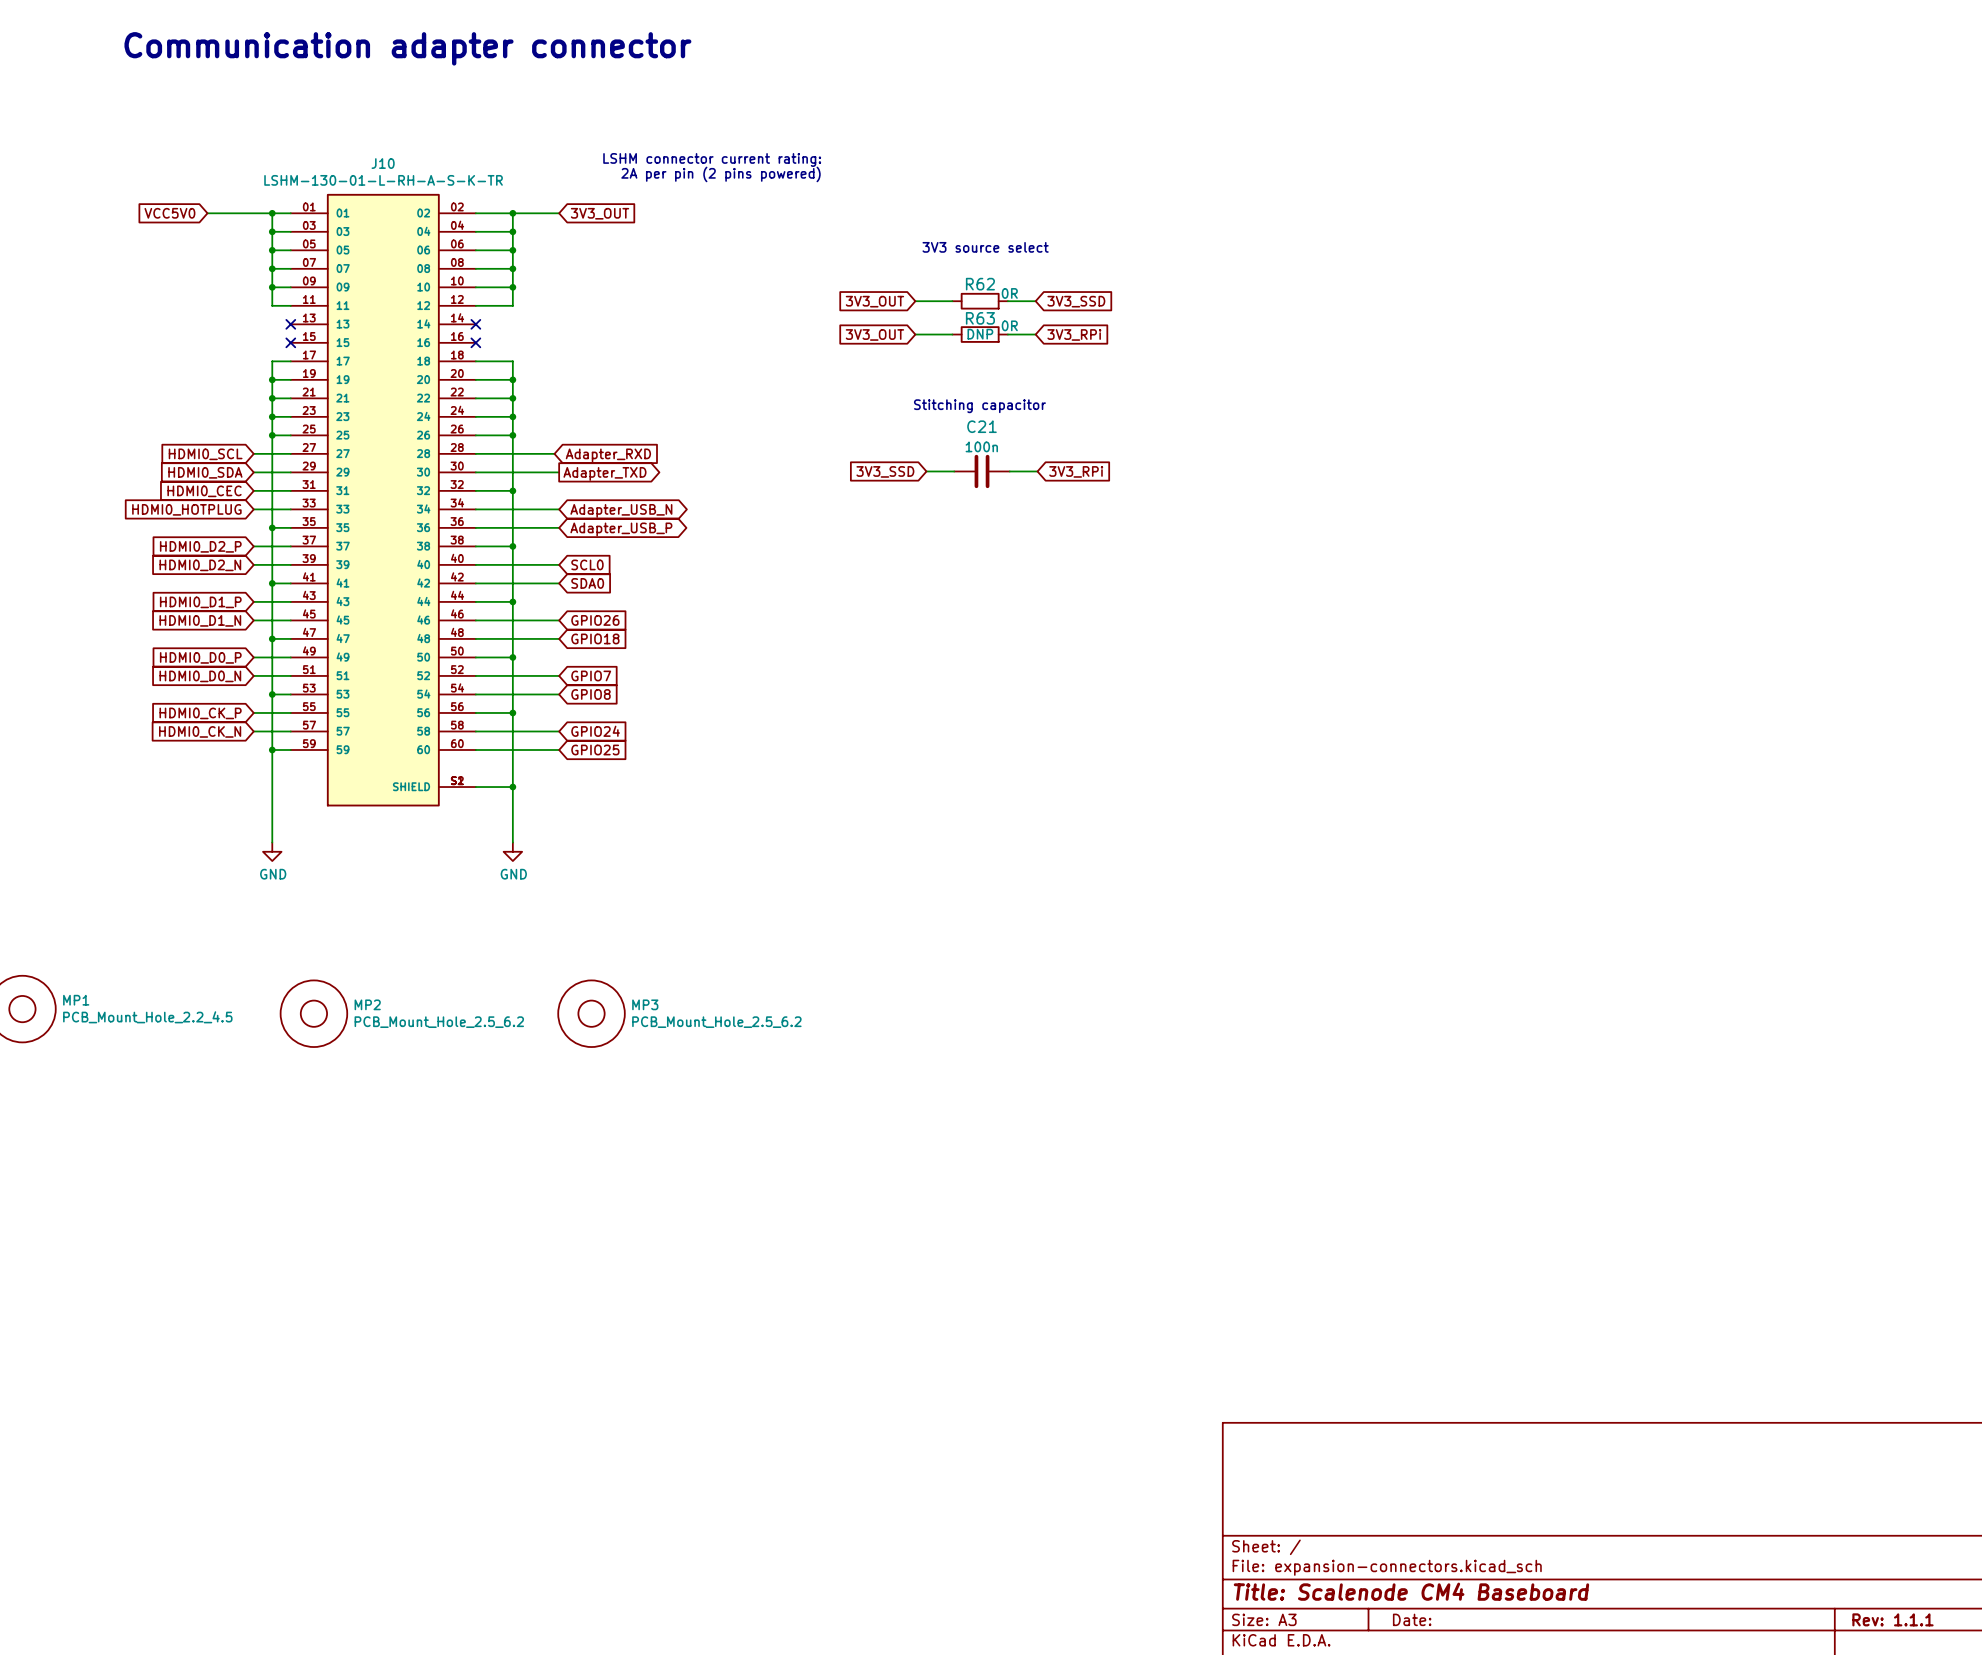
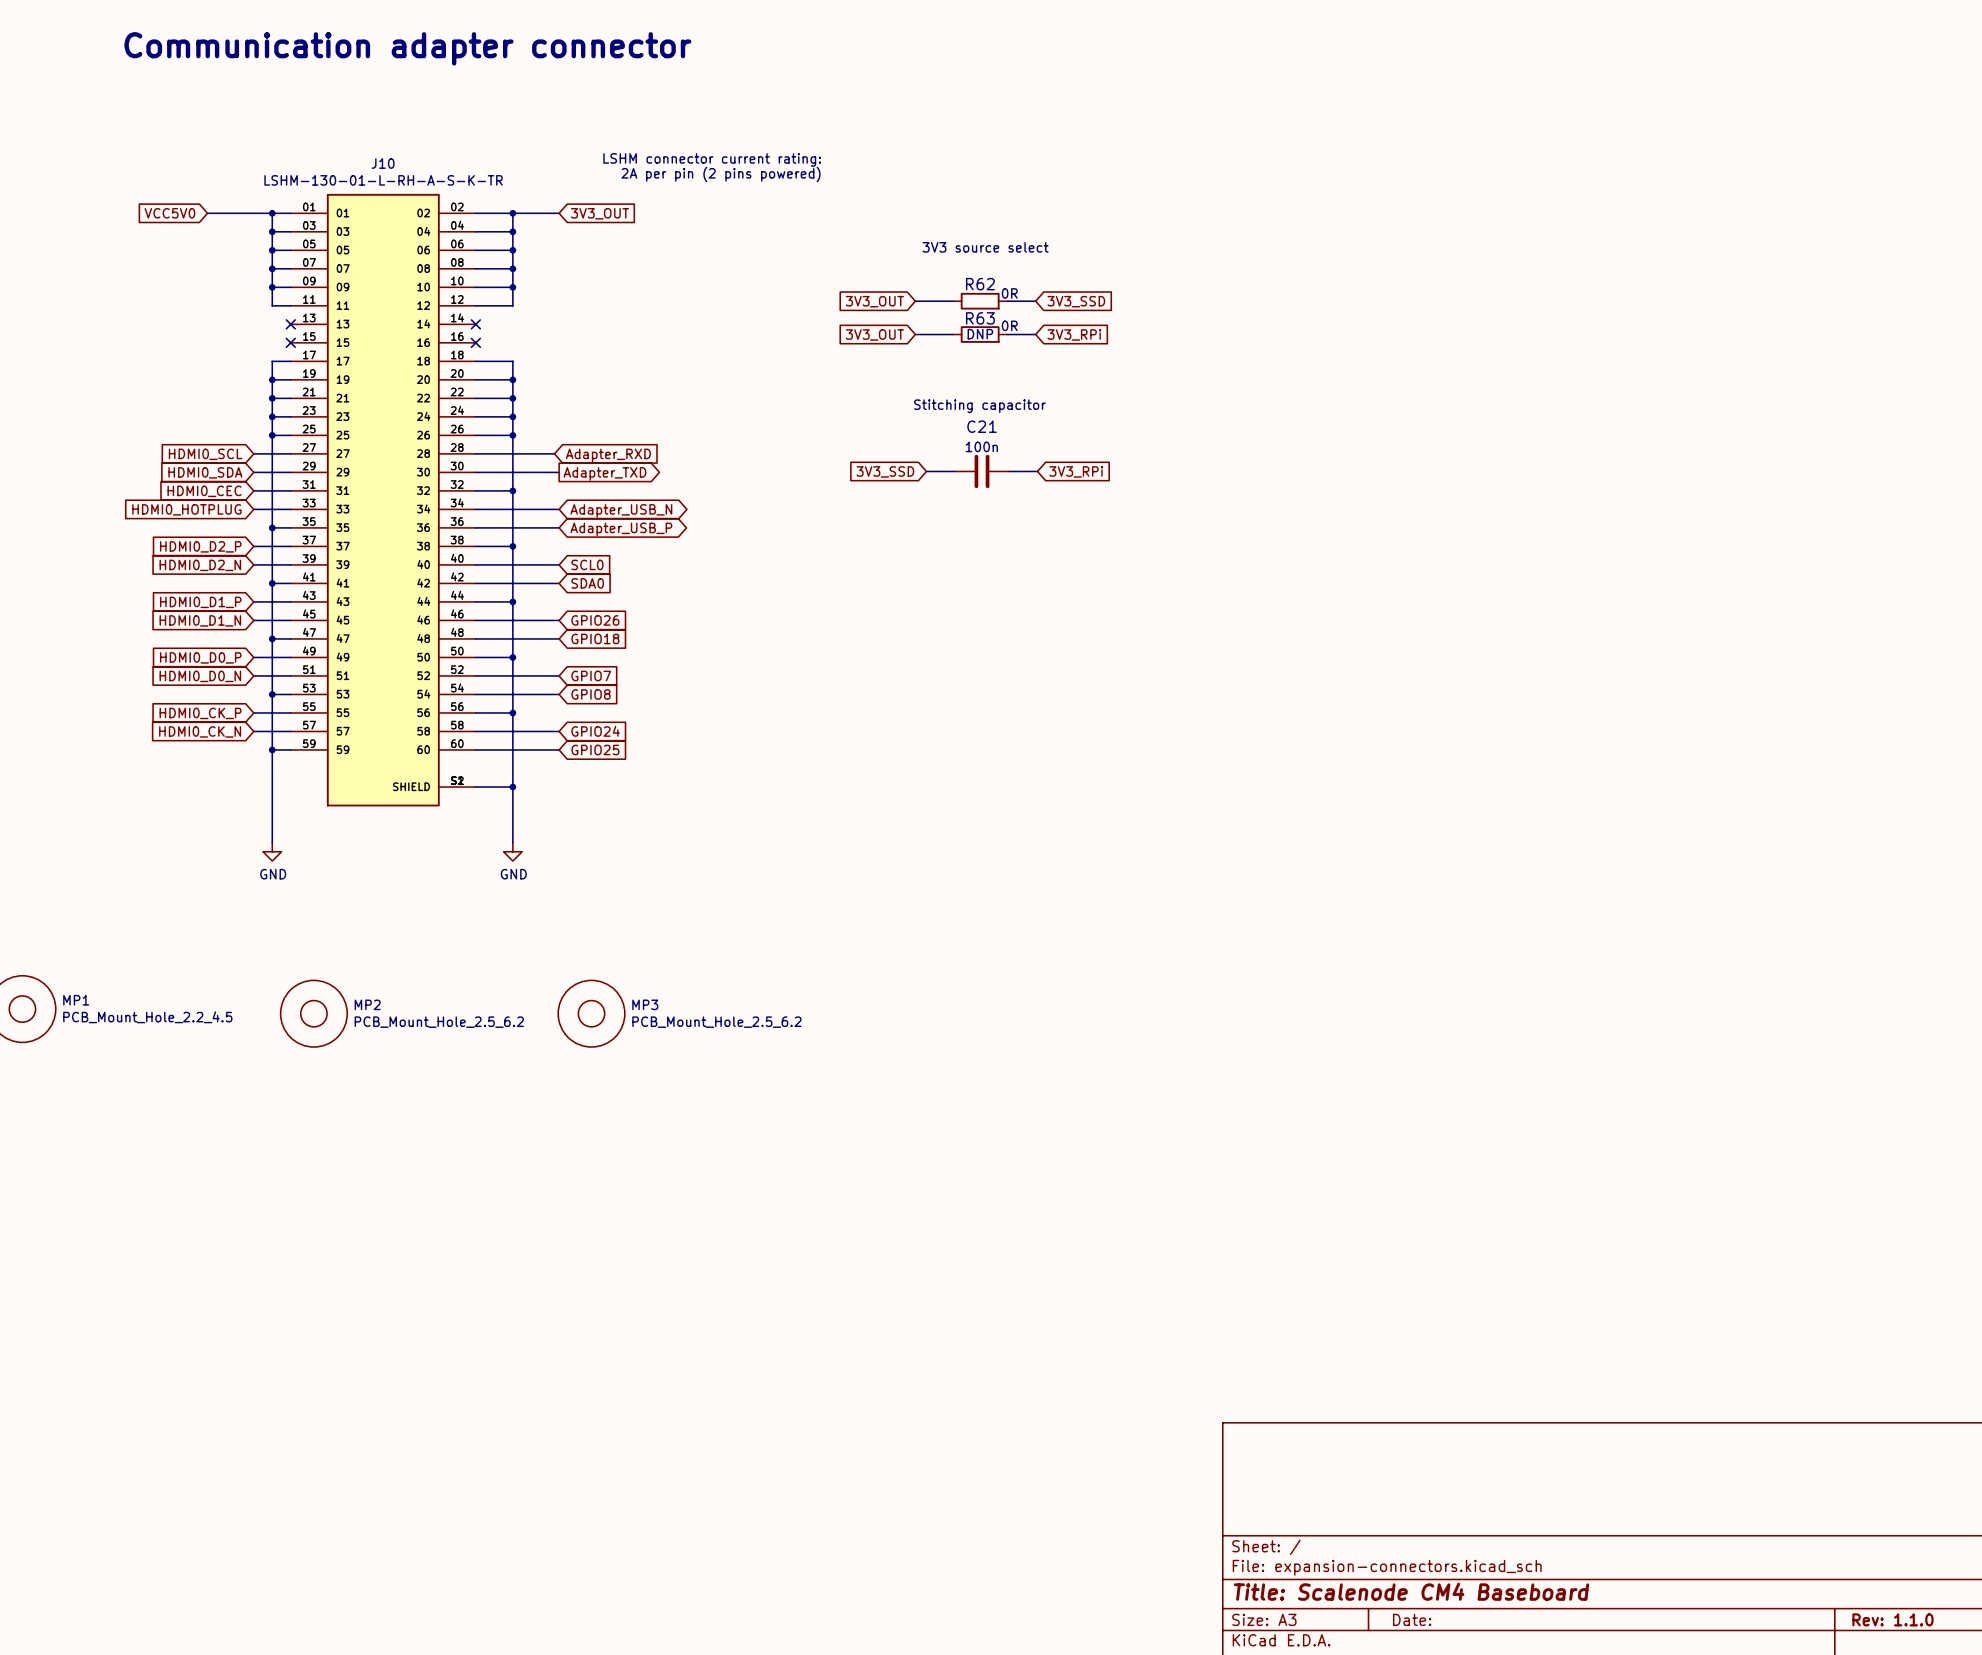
title block: Rev: 1.1.1 (1892, 1619) -> Rev: 1.1.0 (1892, 1619)

